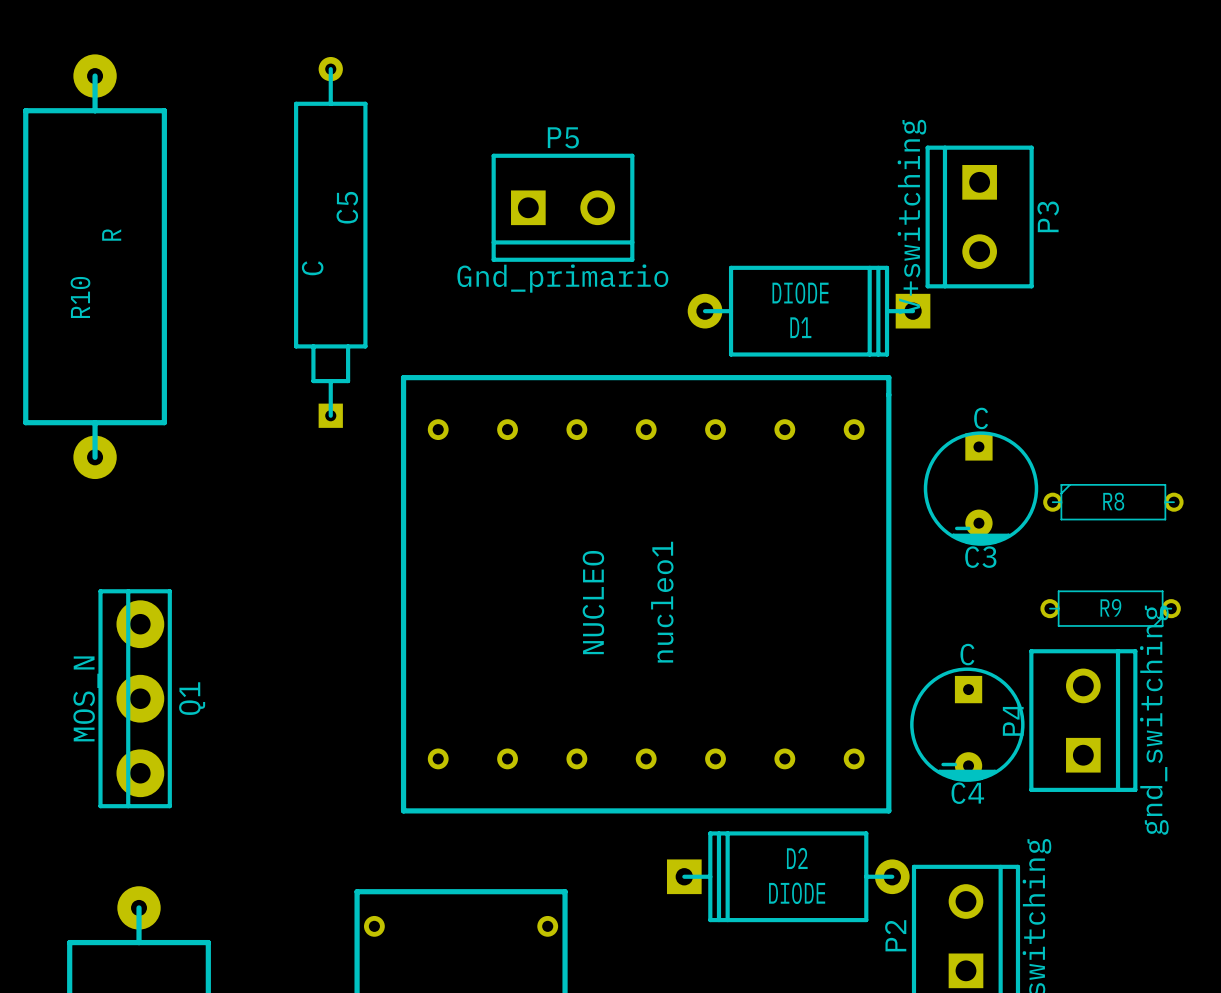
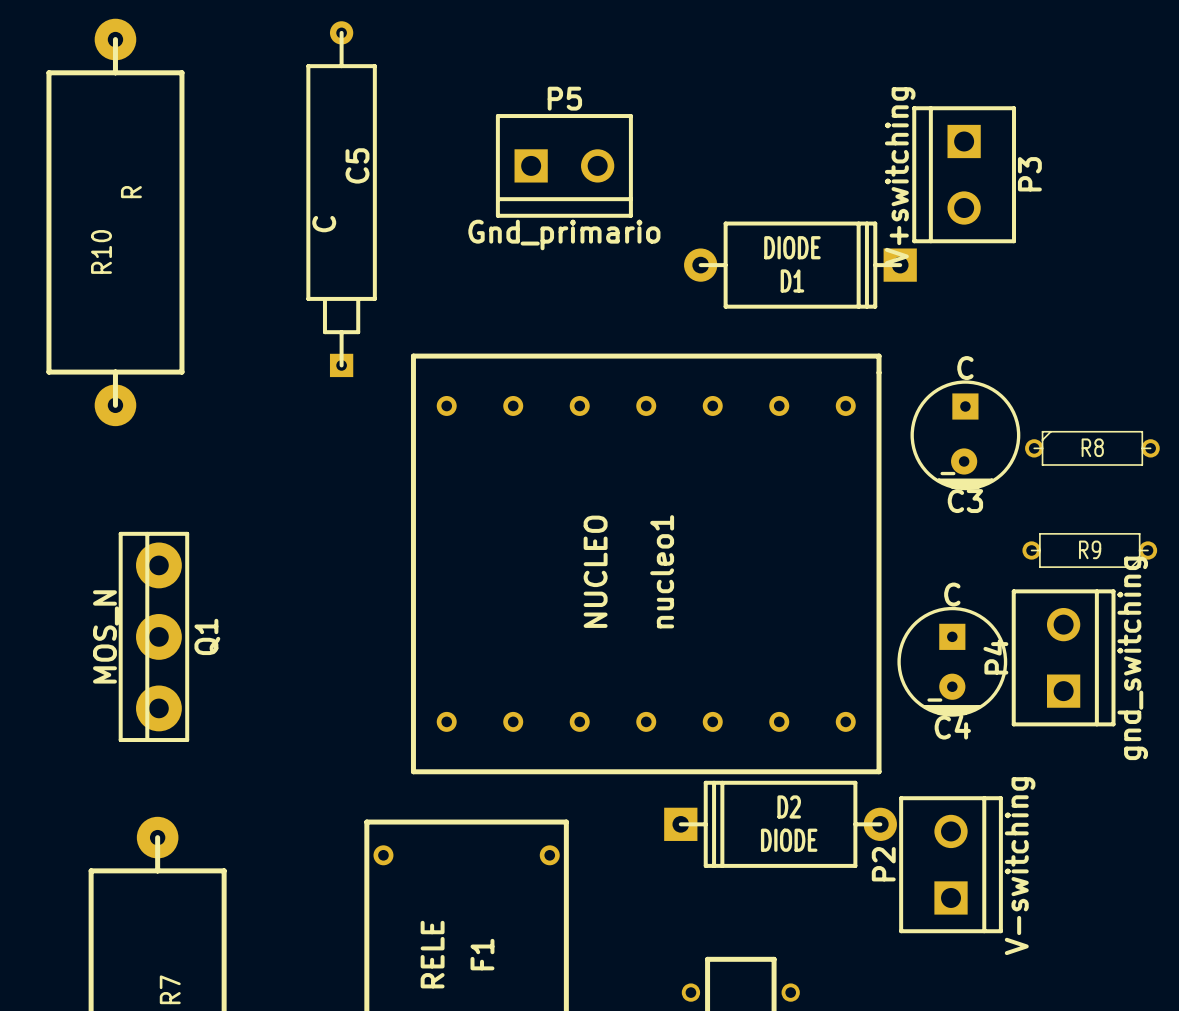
C3 footprint: [923, 431, 1039, 546] -> [910, 380, 1021, 491]
nucleo1 position: (646, 594) -> (646, 563)
C4 footprint: [910, 667, 1025, 782] -> [897, 606, 1008, 717]
D2 position: (788, 876) -> (780, 824)

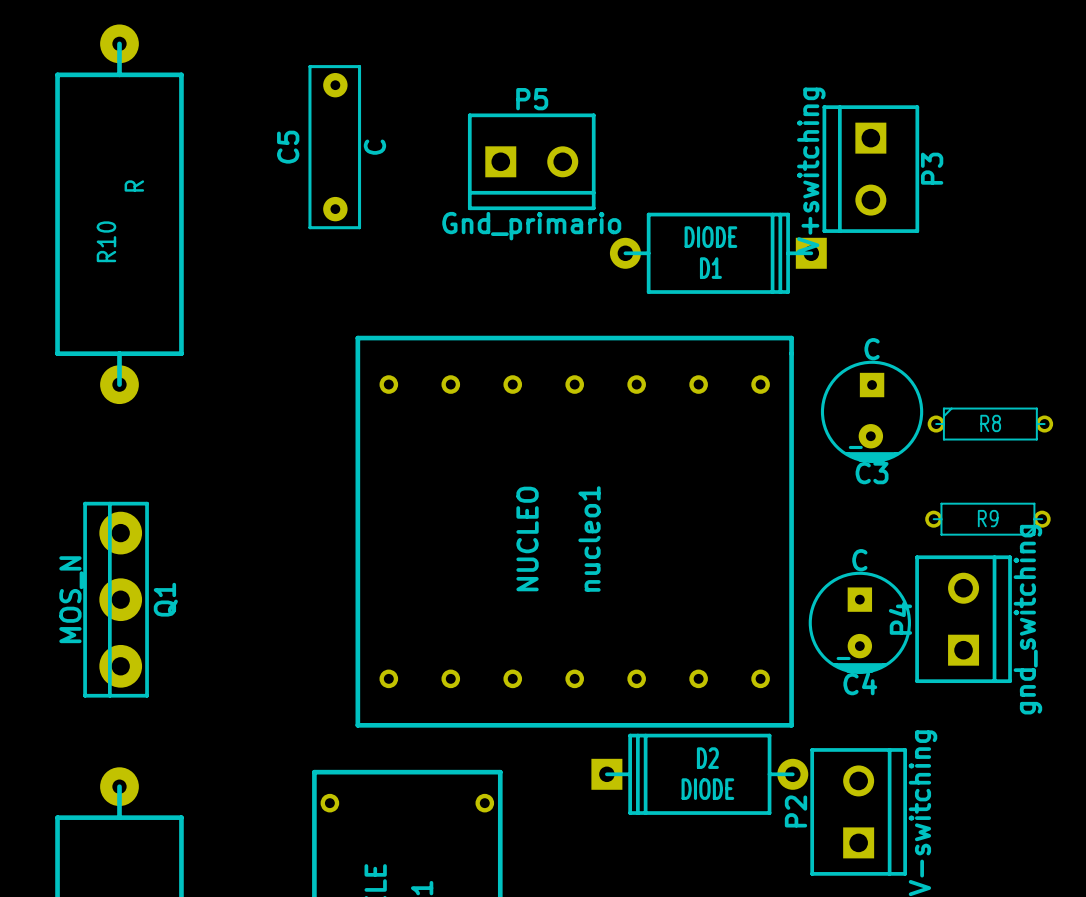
C5 footprint: [306, 21, 377, 378] -> [308, 65, 362, 230]
C5 name position: C5 (357, 165) -> C5 (288, 147)
P5 position: (564, 165) -> (531, 161)
R10 position: (115, 222) -> (119, 214)
C5 value position: C (324, 224) -> C (374, 147)

